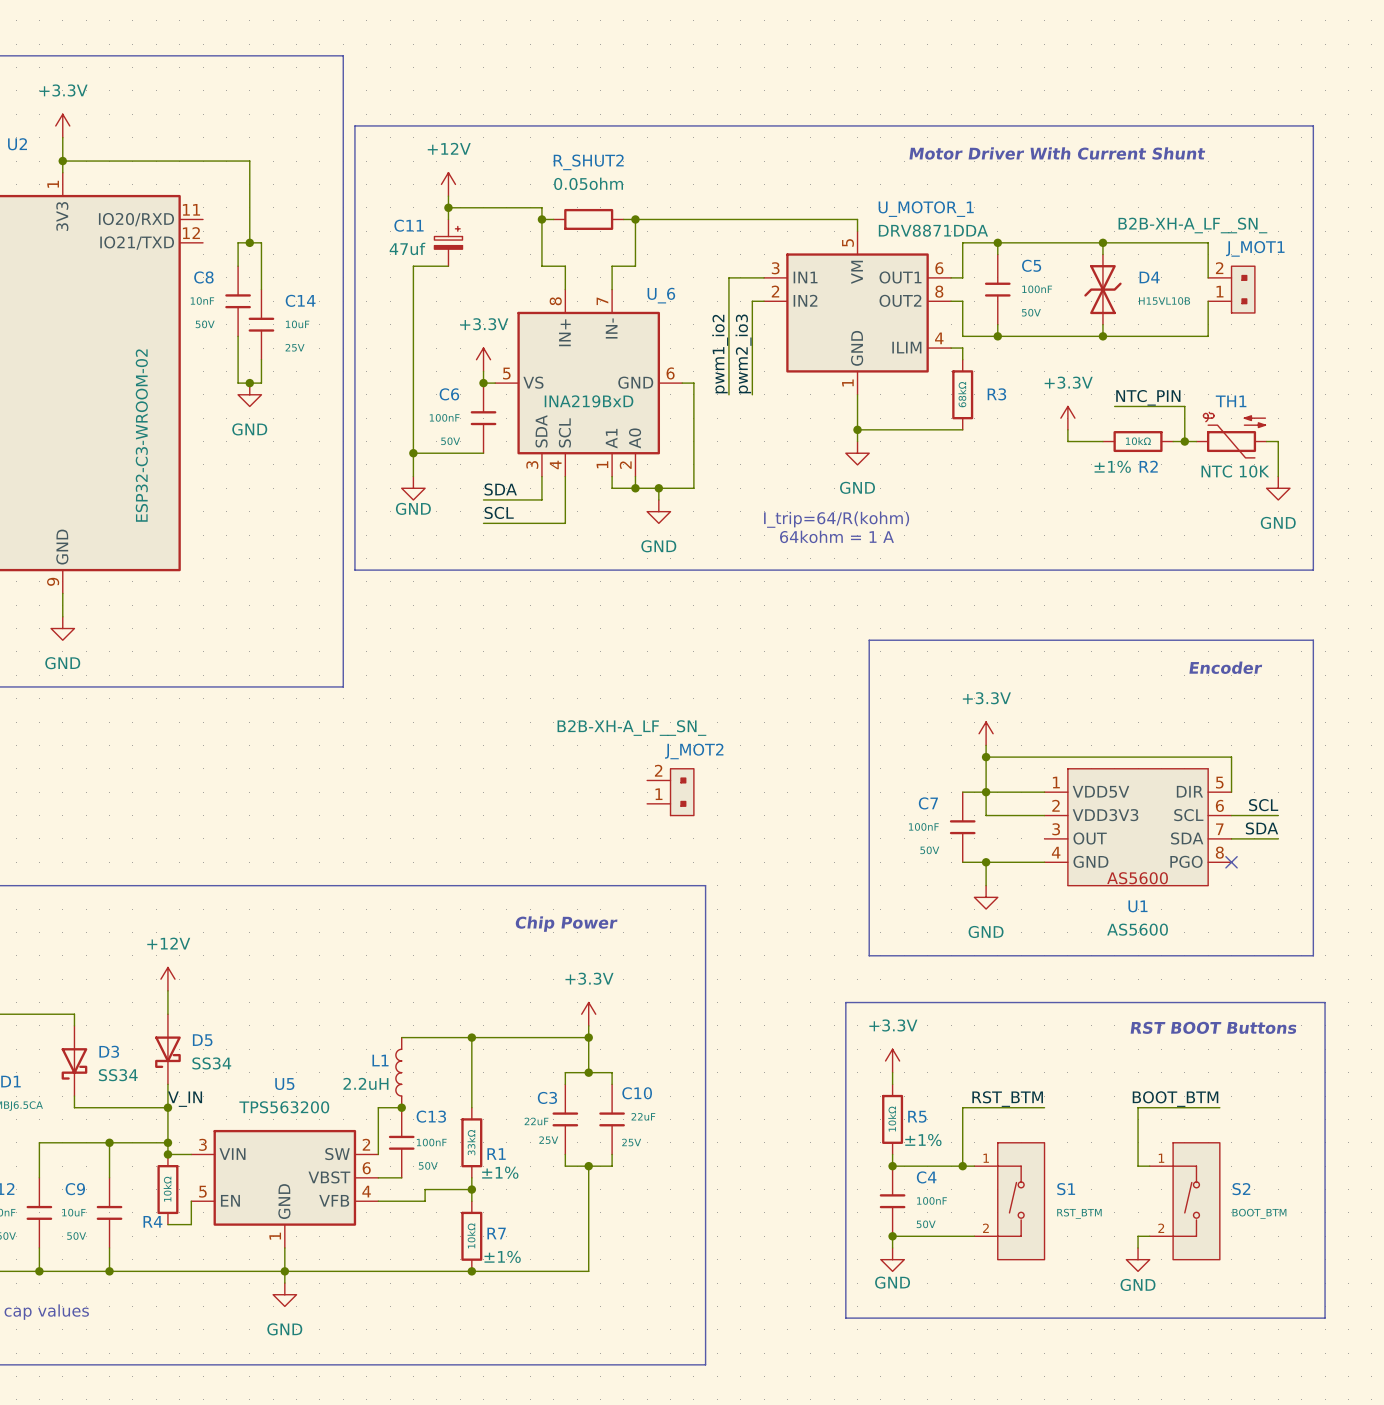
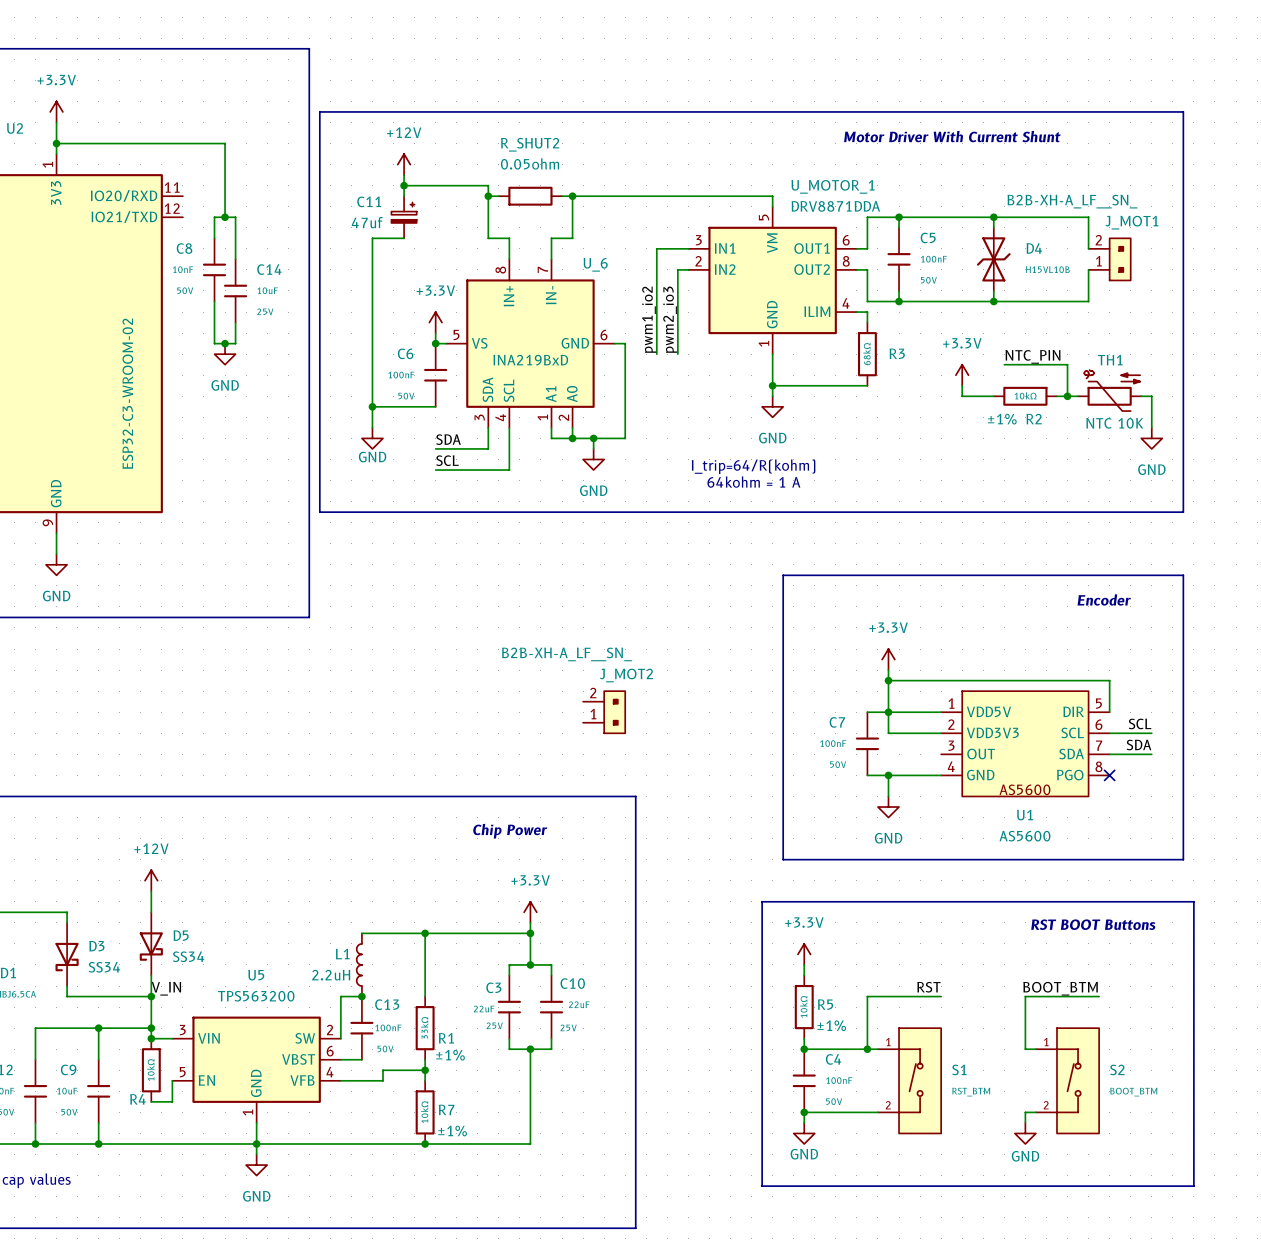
label: RST_BTM (1007, 1099) -> RST (928, 987)

